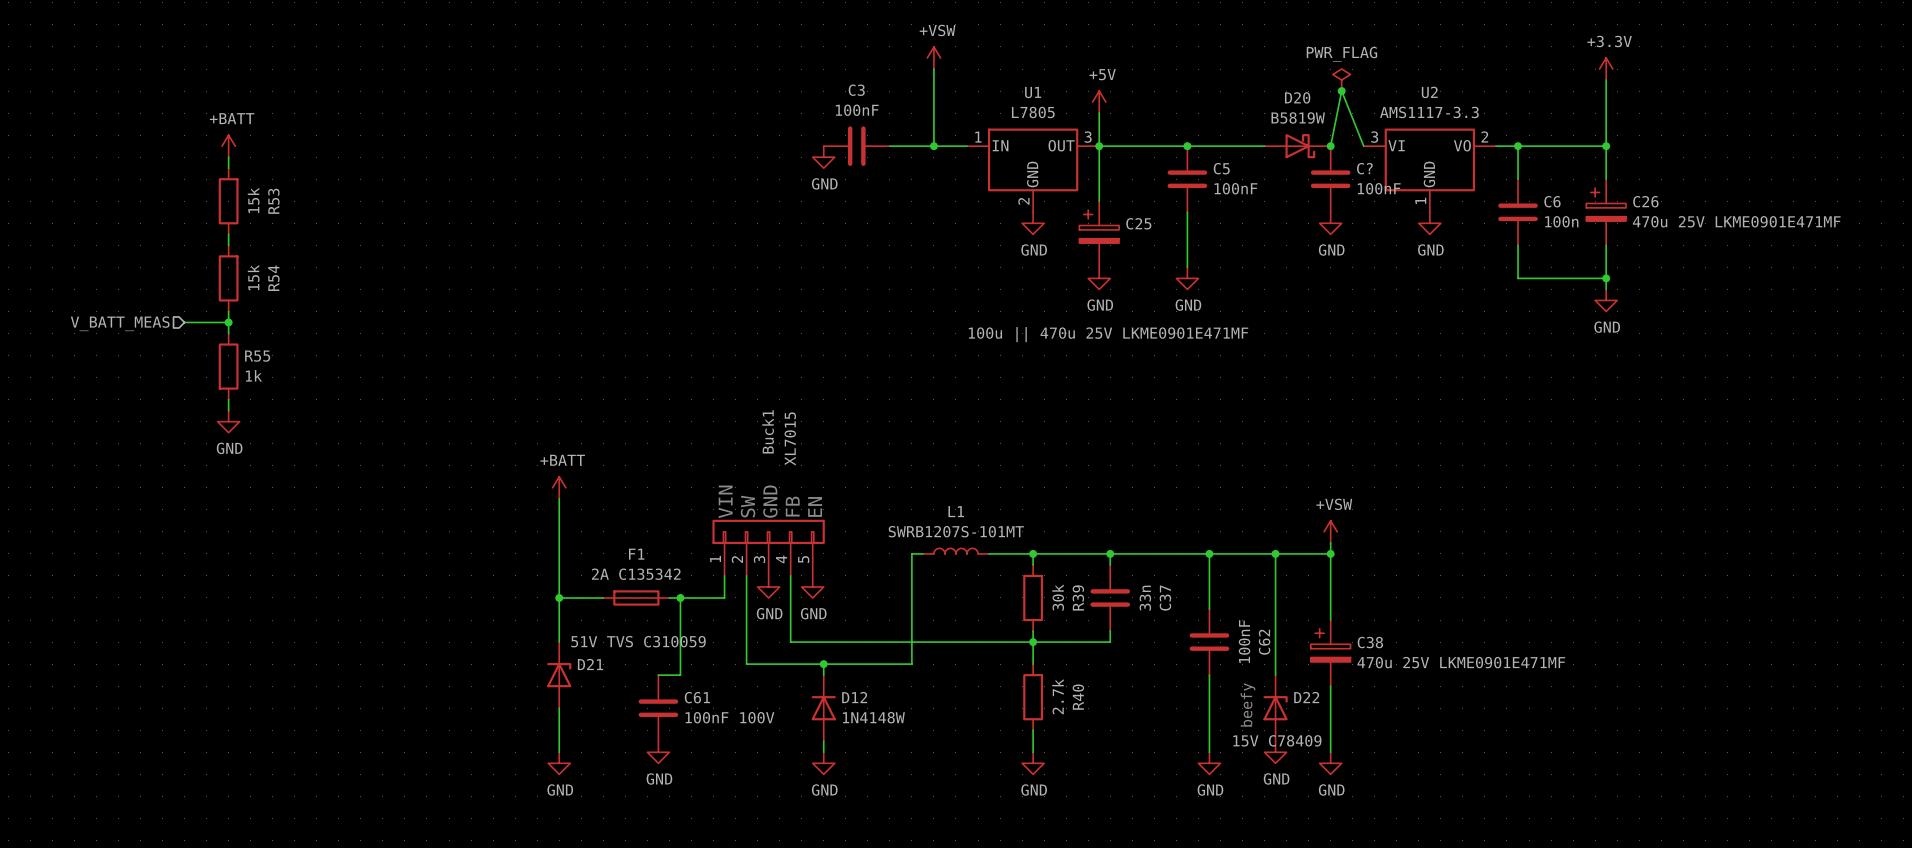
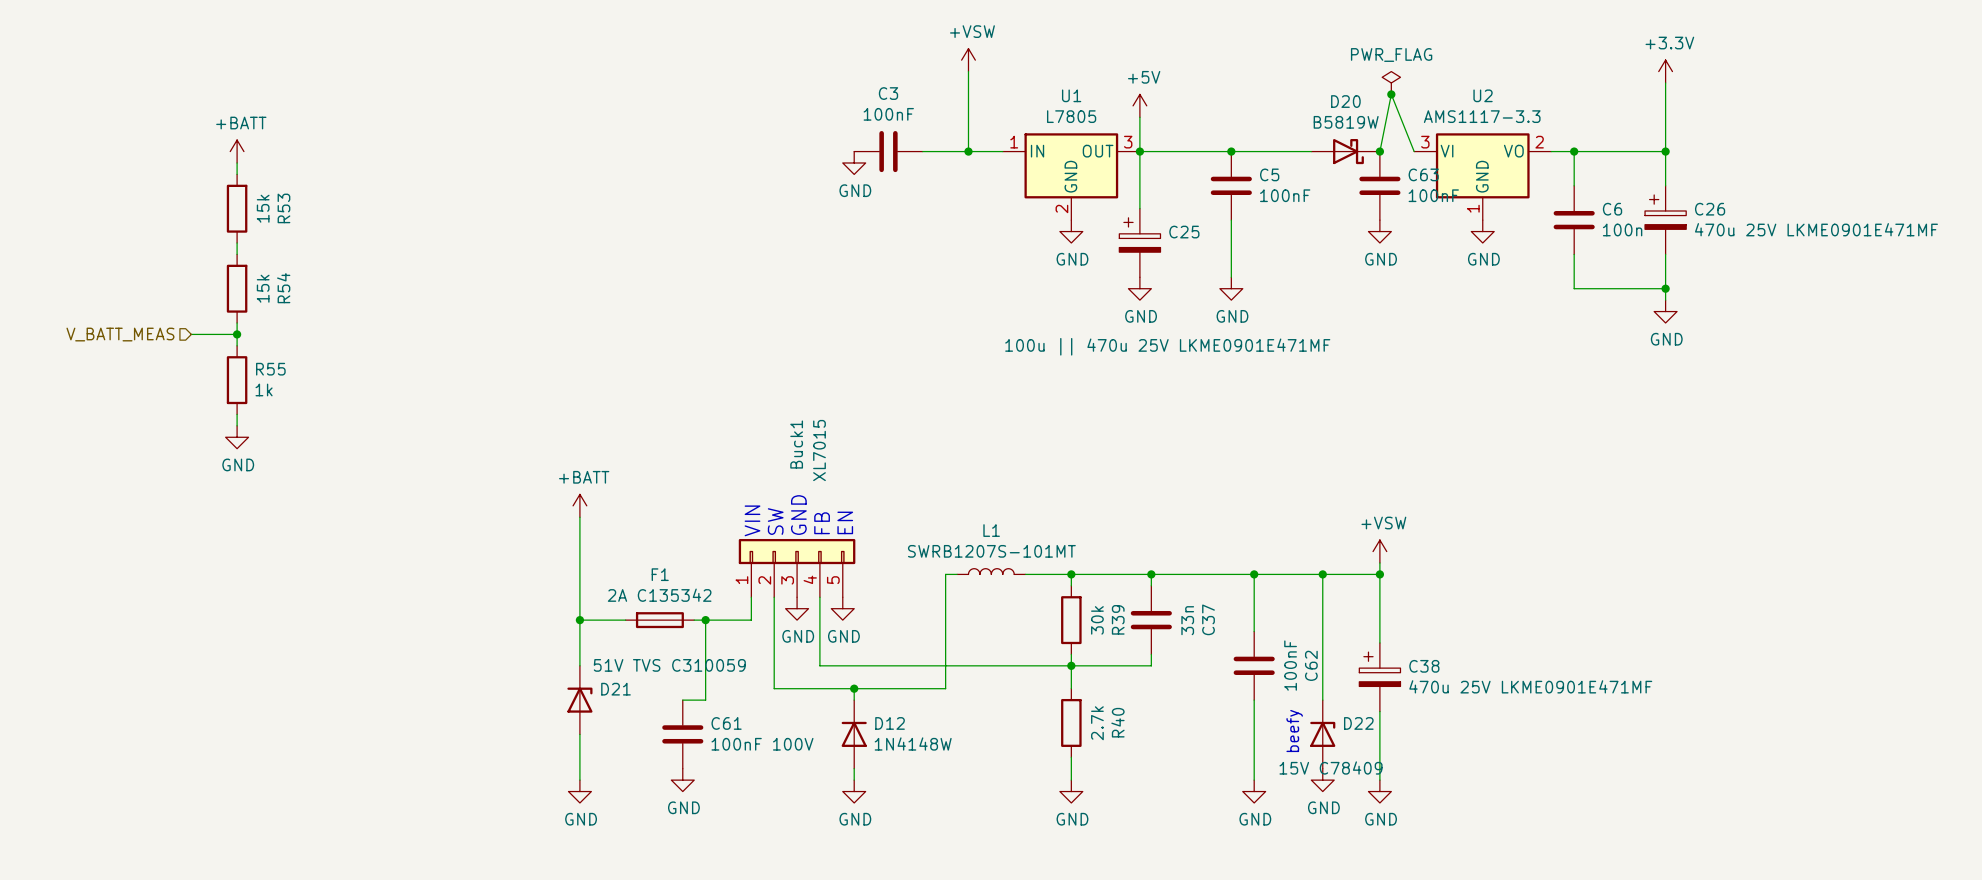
C? name: C? (1364, 168) -> C63 (1423, 174)

